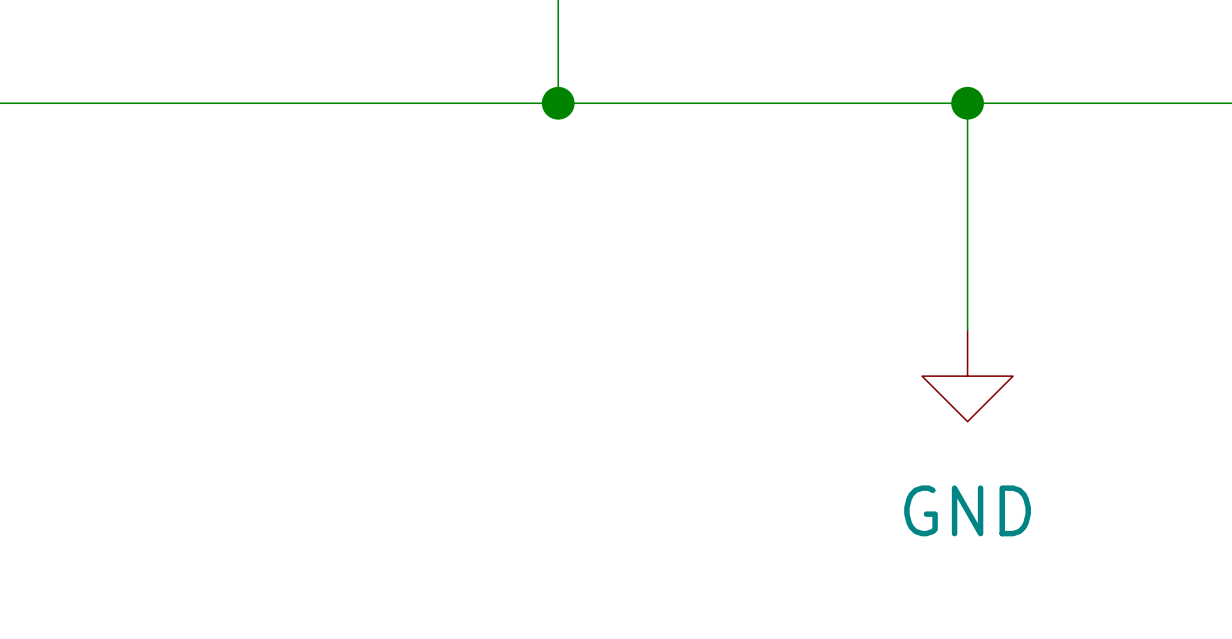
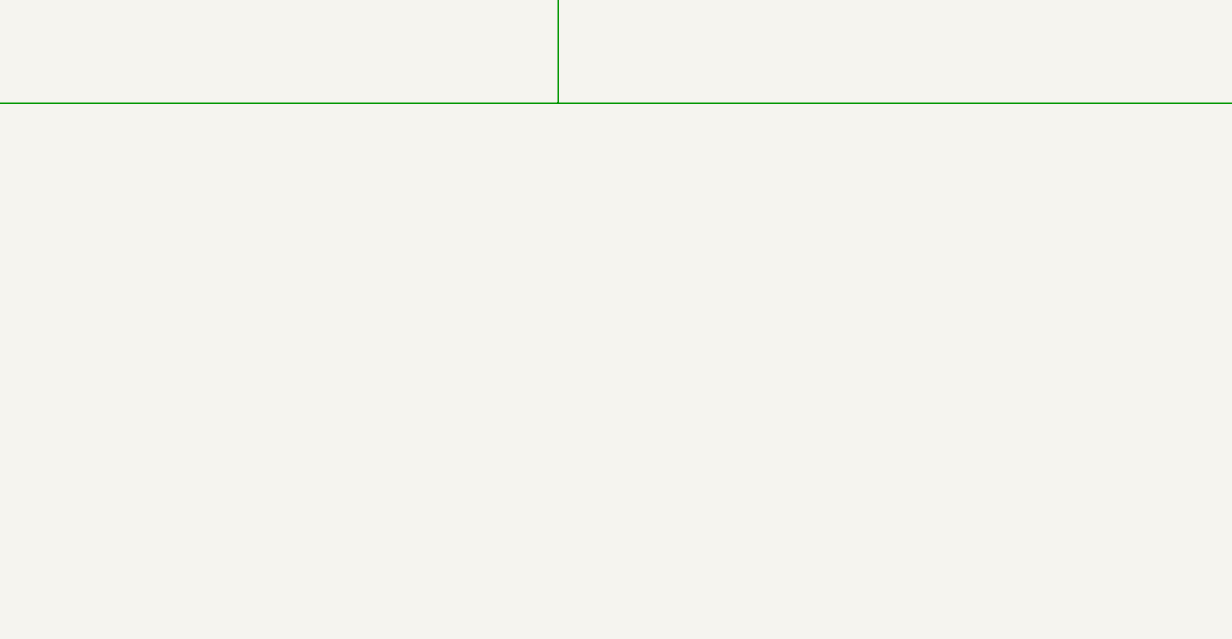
junction: (558, 103) -> none
wire: (967, 103) (967, 330) -> none
junction: (967, 103) -> none
power symbol: GND (967, 376) -> none

